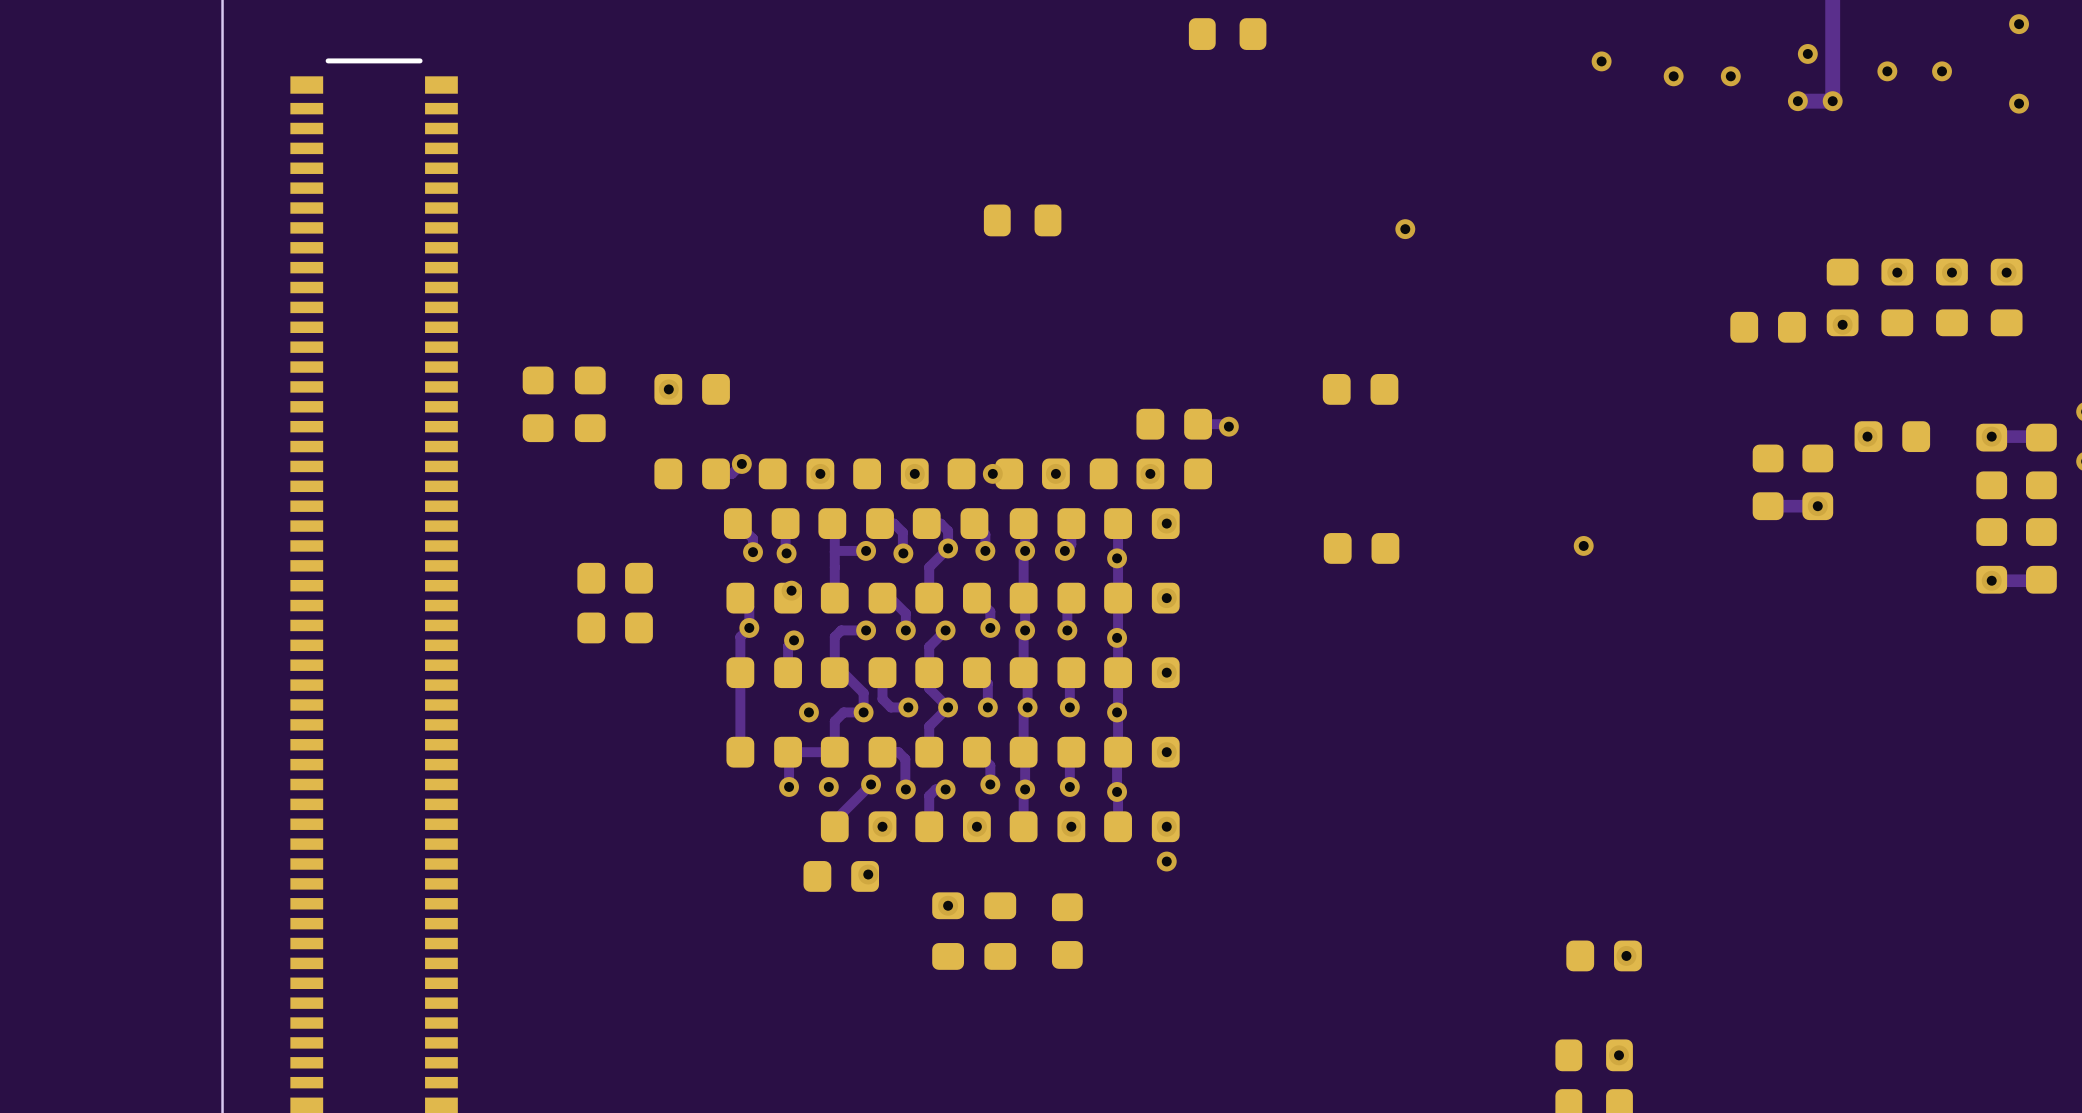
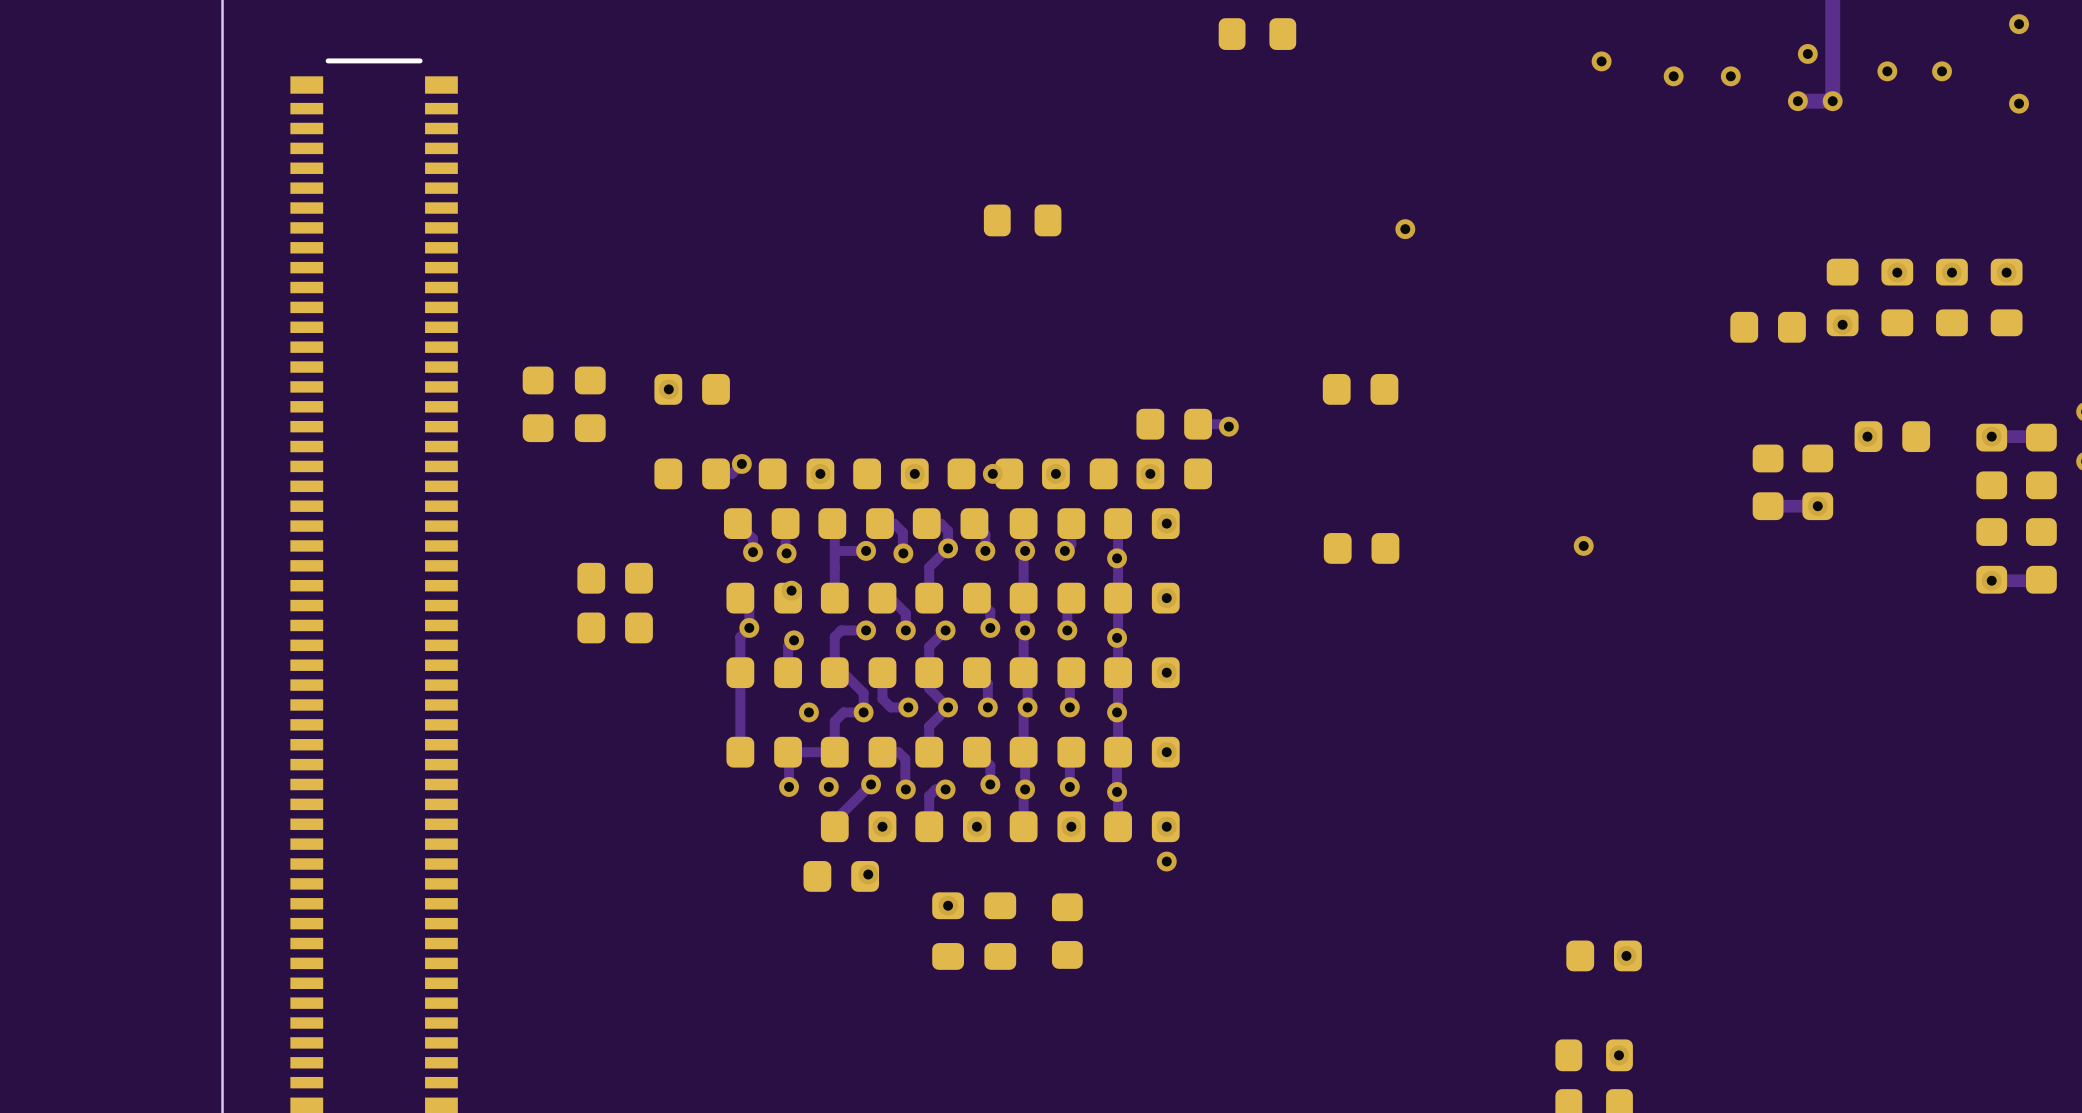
part: (1227, 34) -> none
part: none -> (1257, 34)

